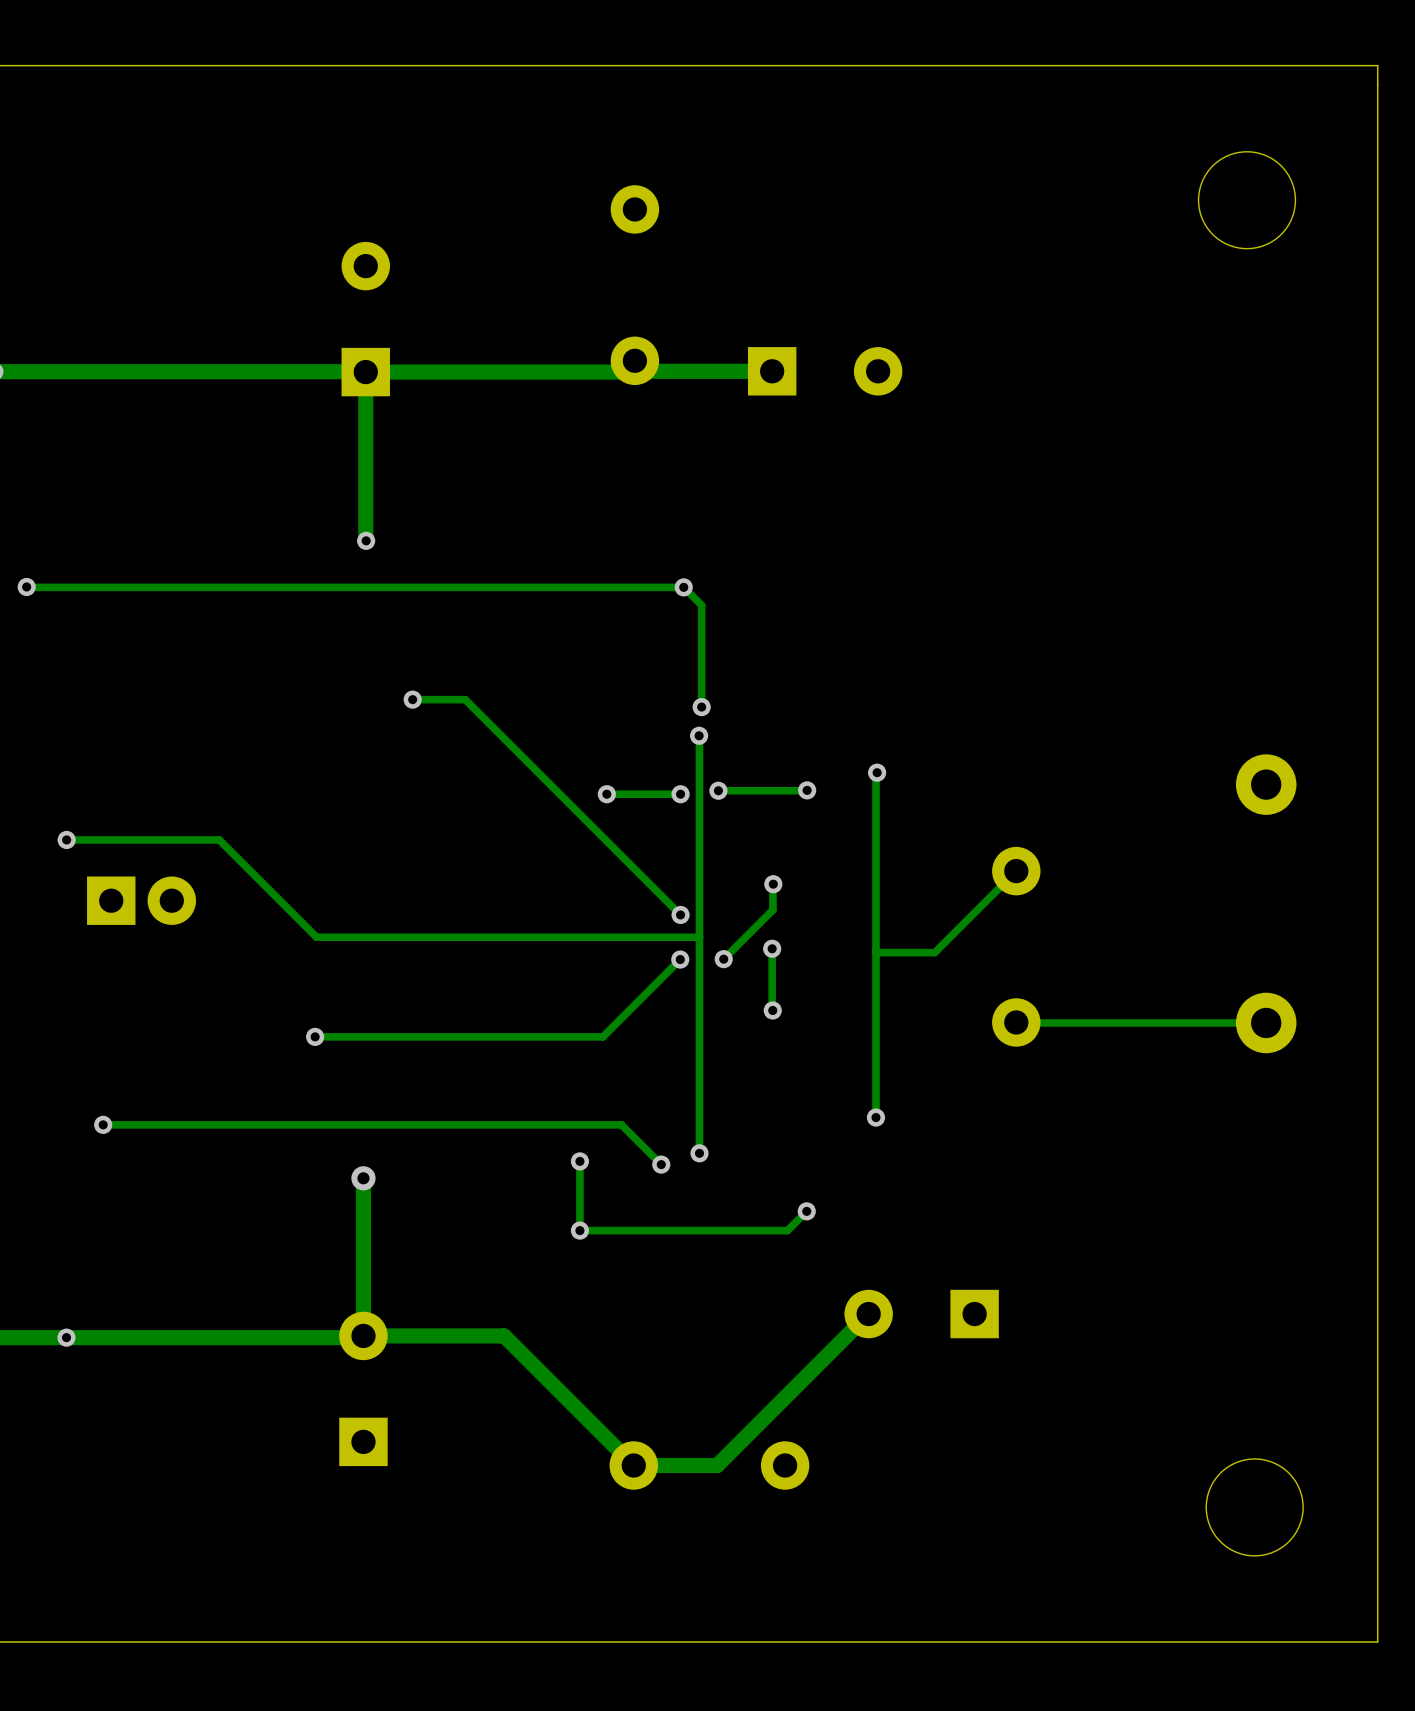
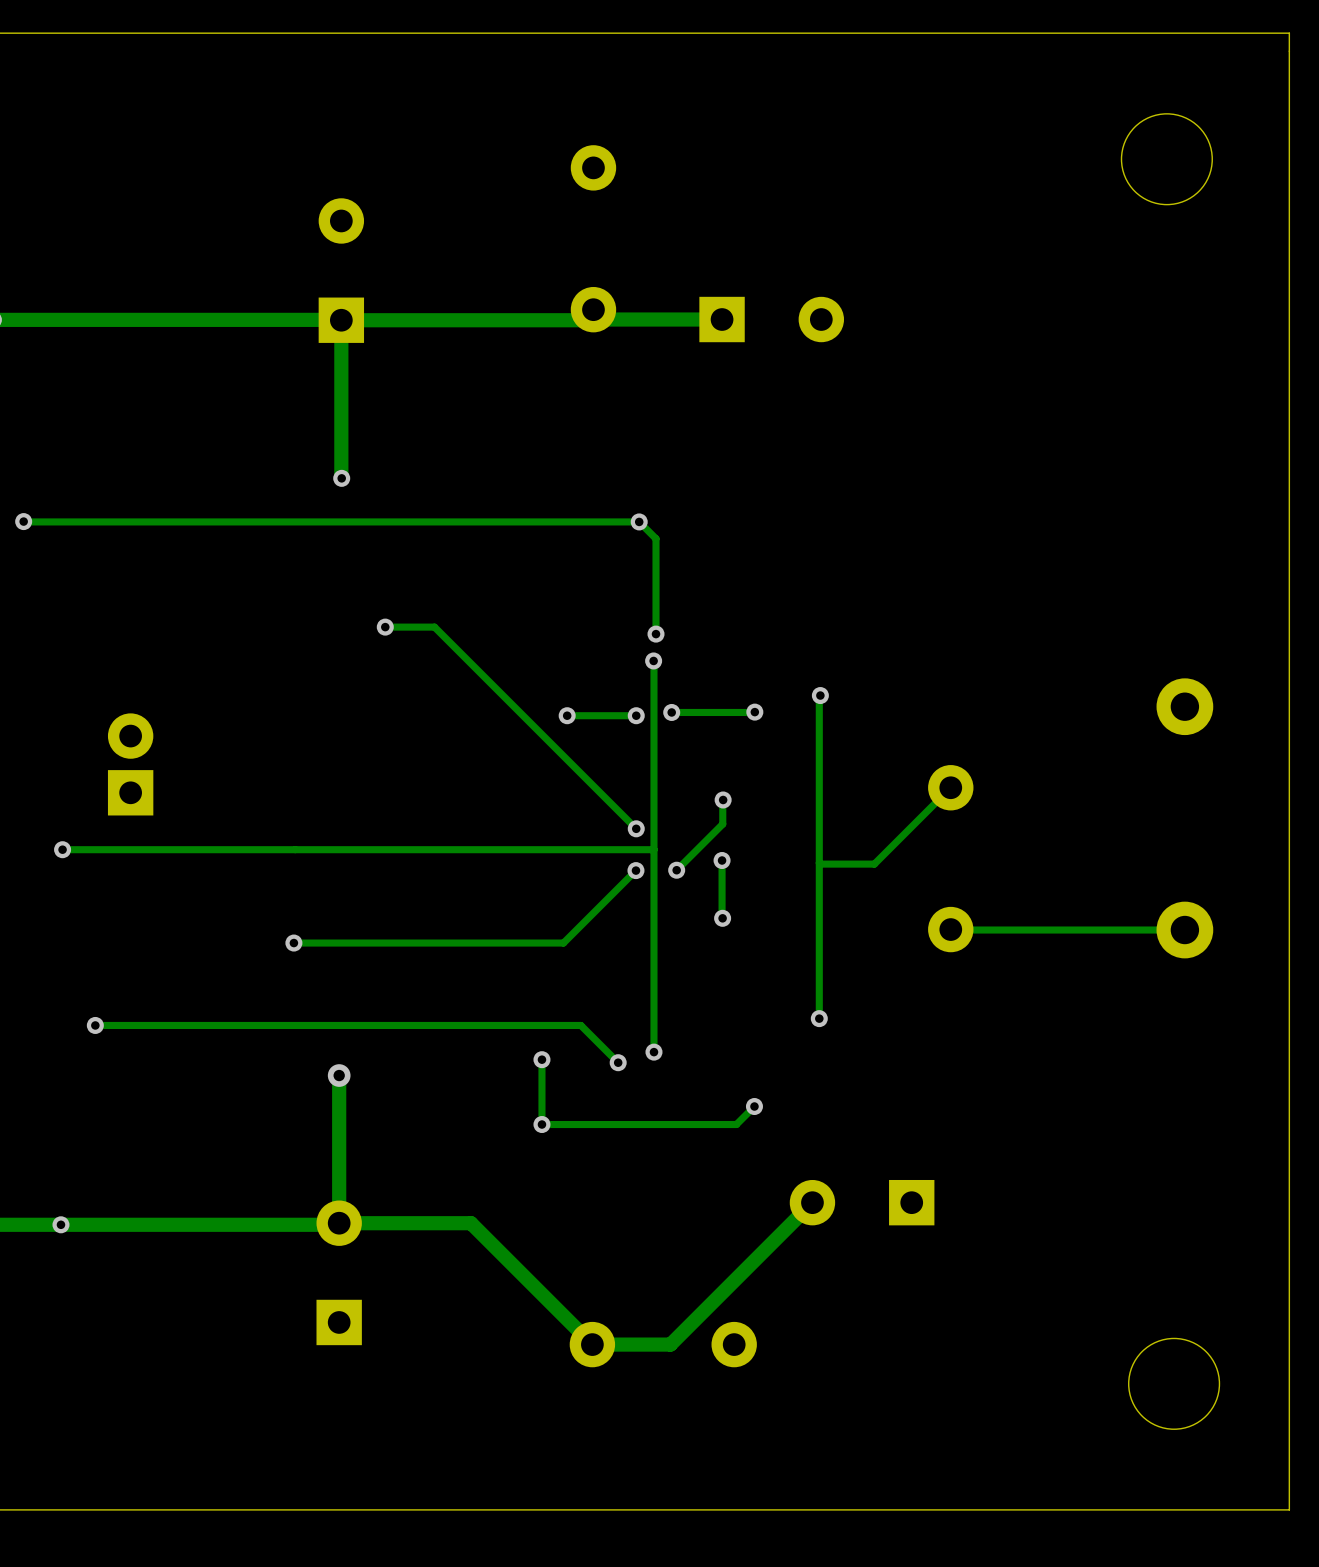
track: (66, 839) (219, 839) (316, 937) -> (62, 849) (295, 849)
via position: (66, 839) -> (62, 849)
part rotation: 0° (141, 900) -> 90° counterclockwise (130, 764)

